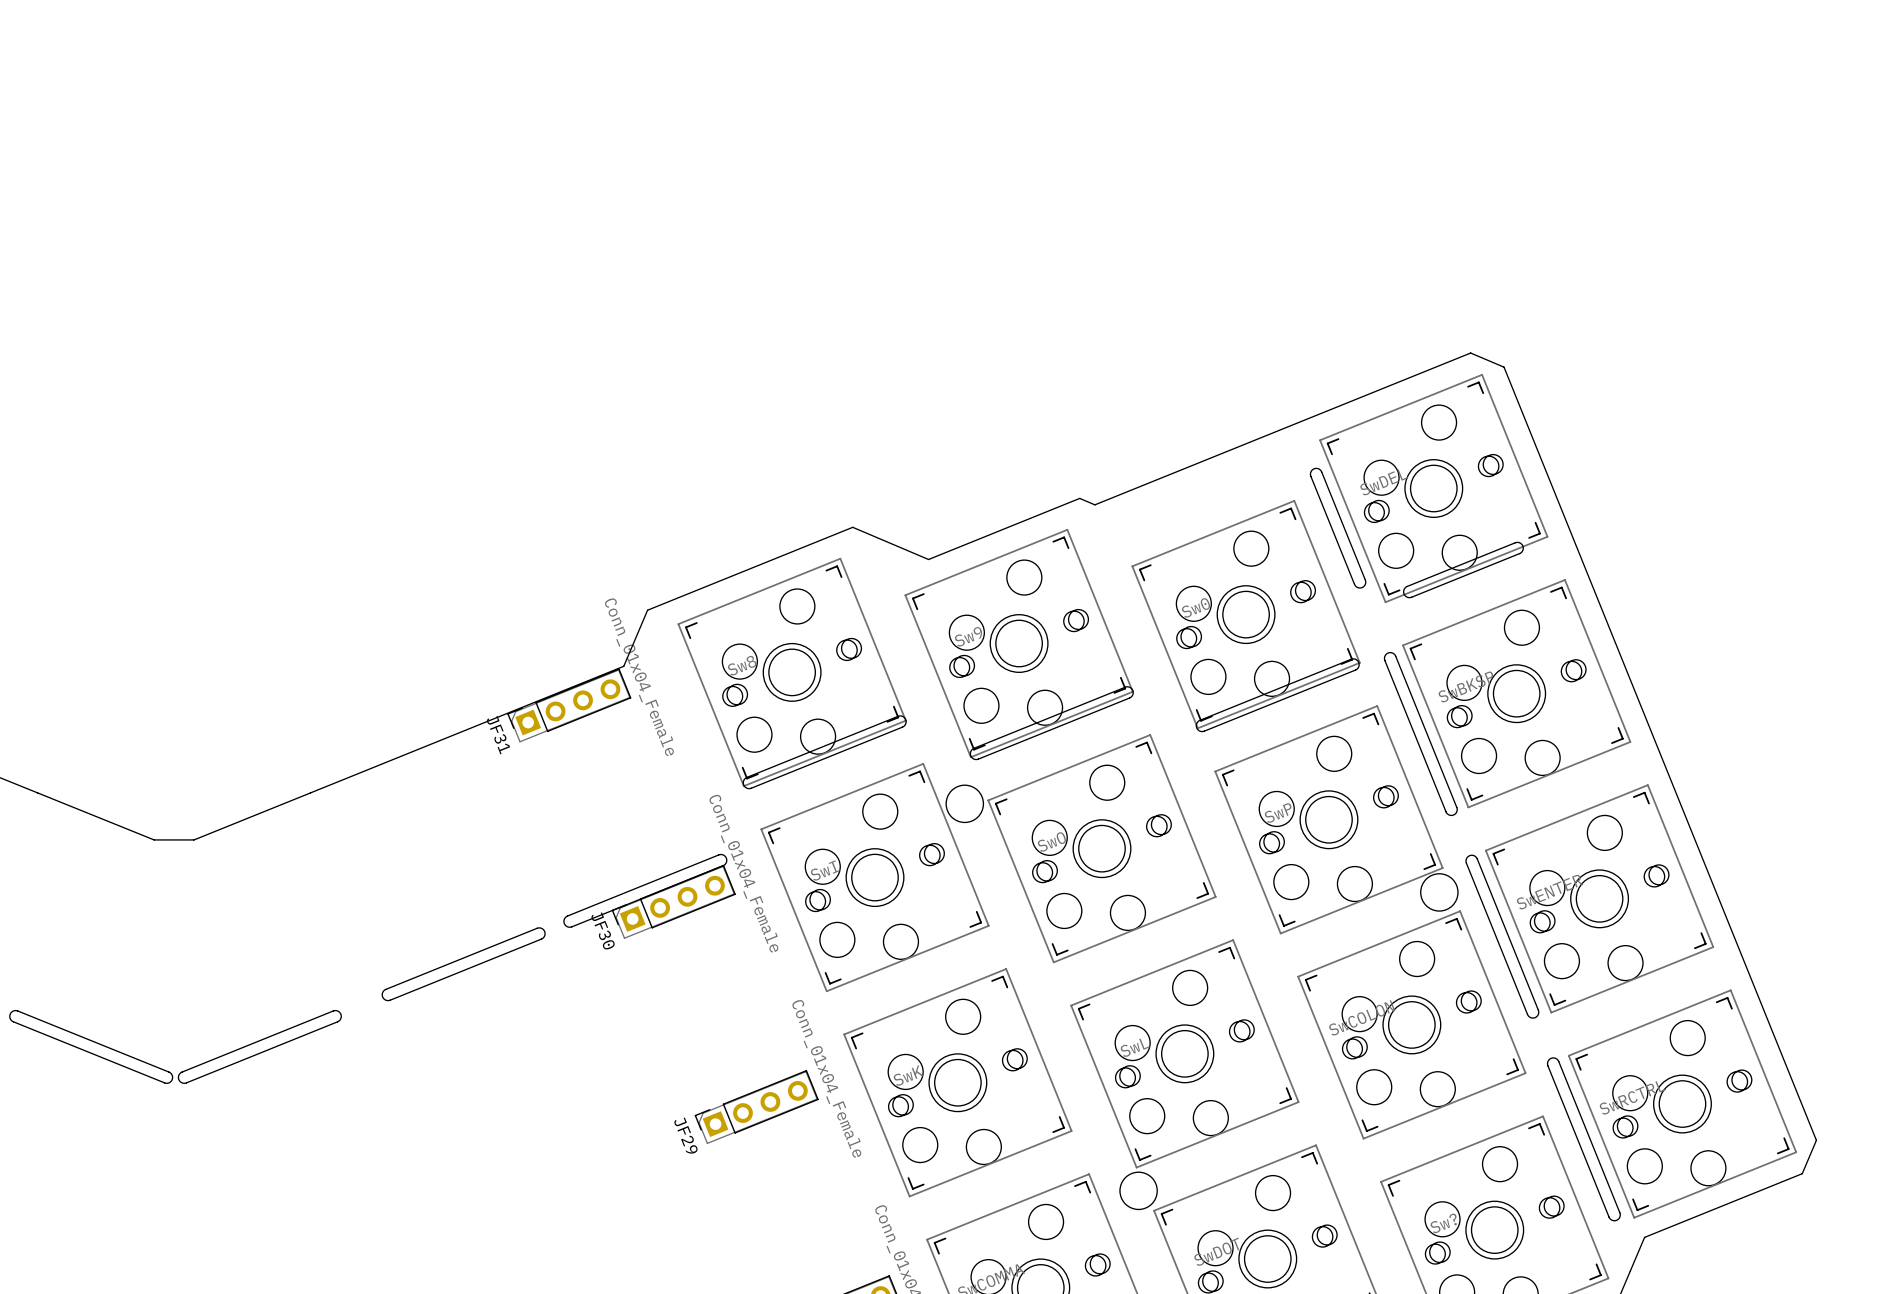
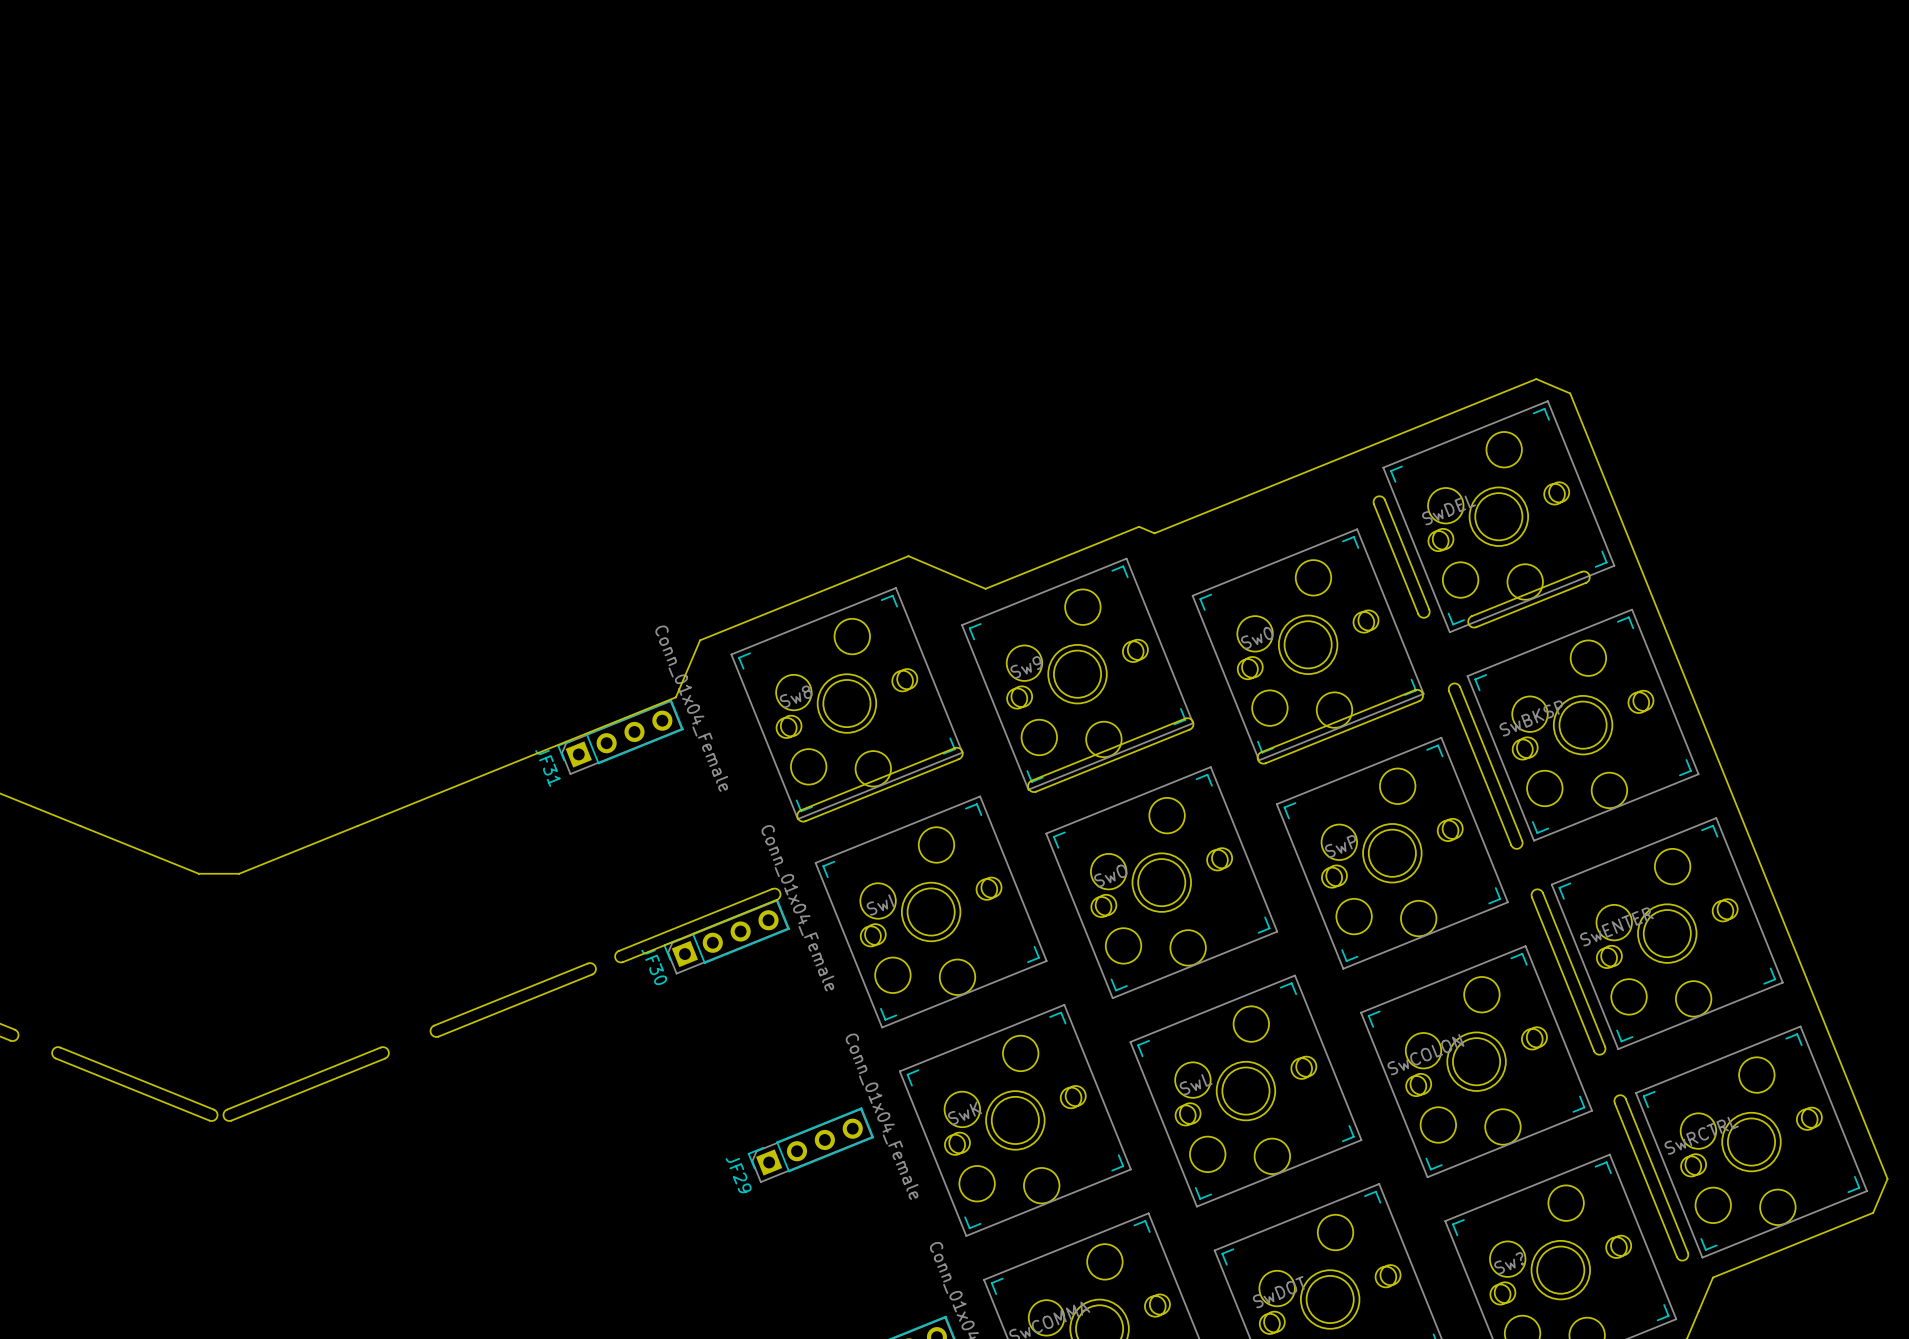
round board edge: [945, 784, 984, 823] -> none
round board edge: [1420, 873, 1459, 912] -> none
round board edge: [1119, 1171, 1158, 1210] -> none

